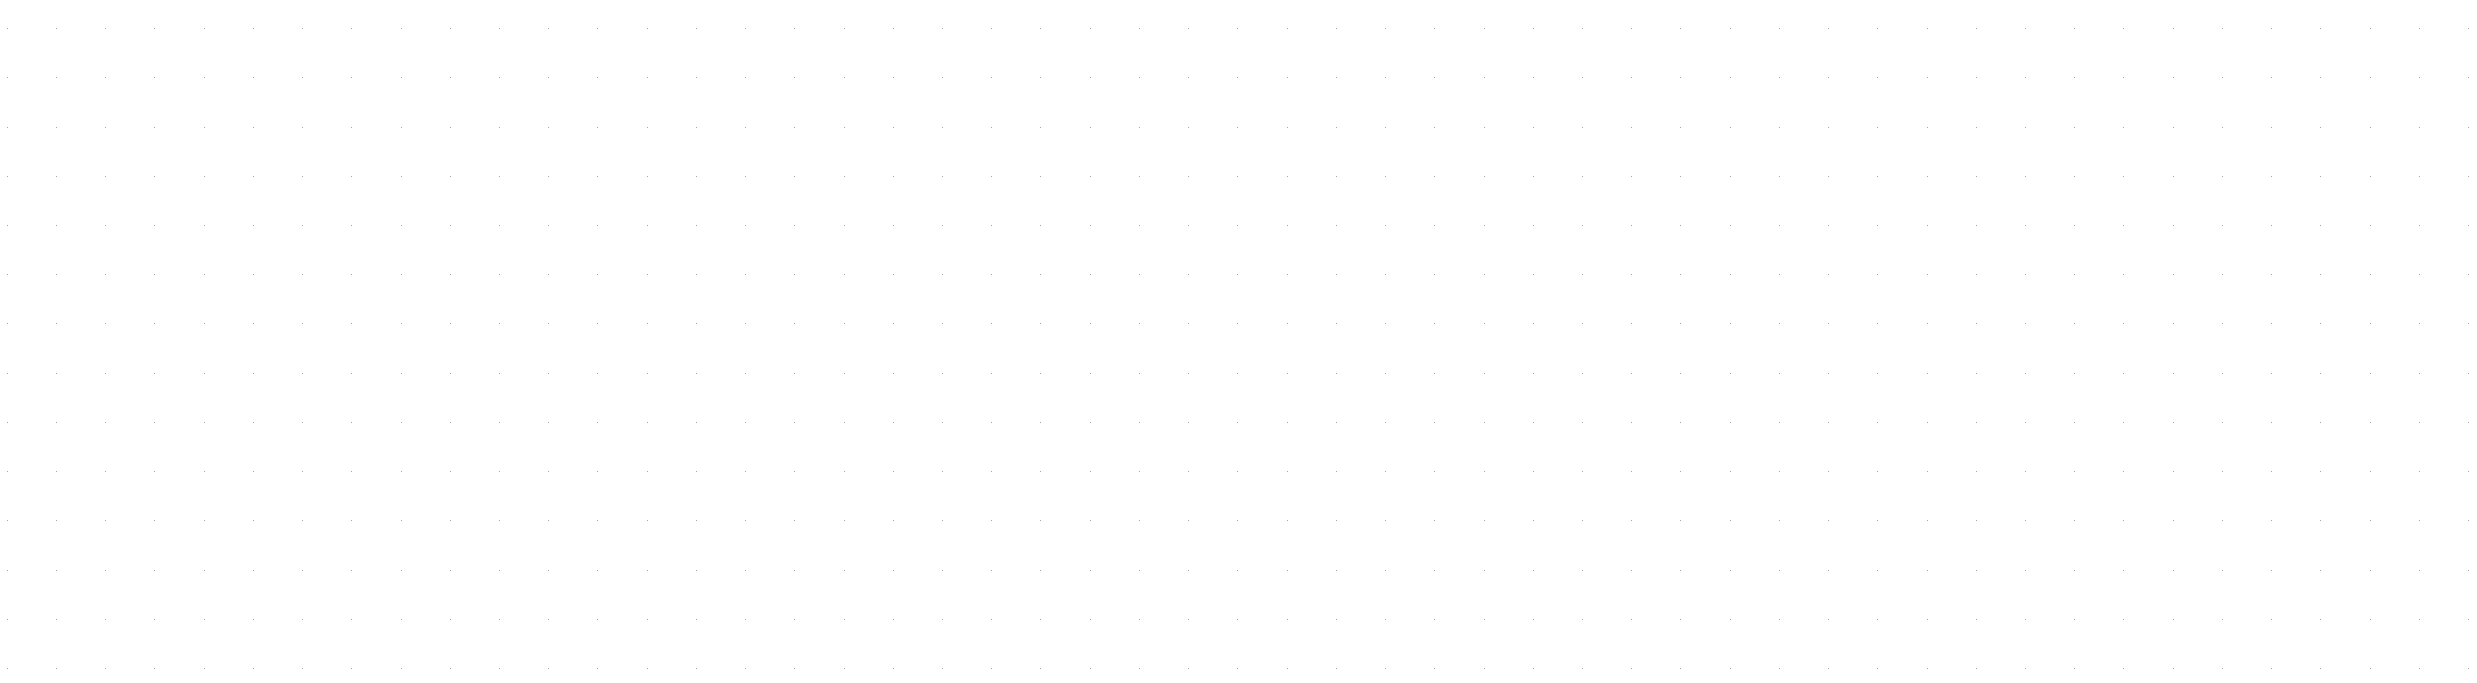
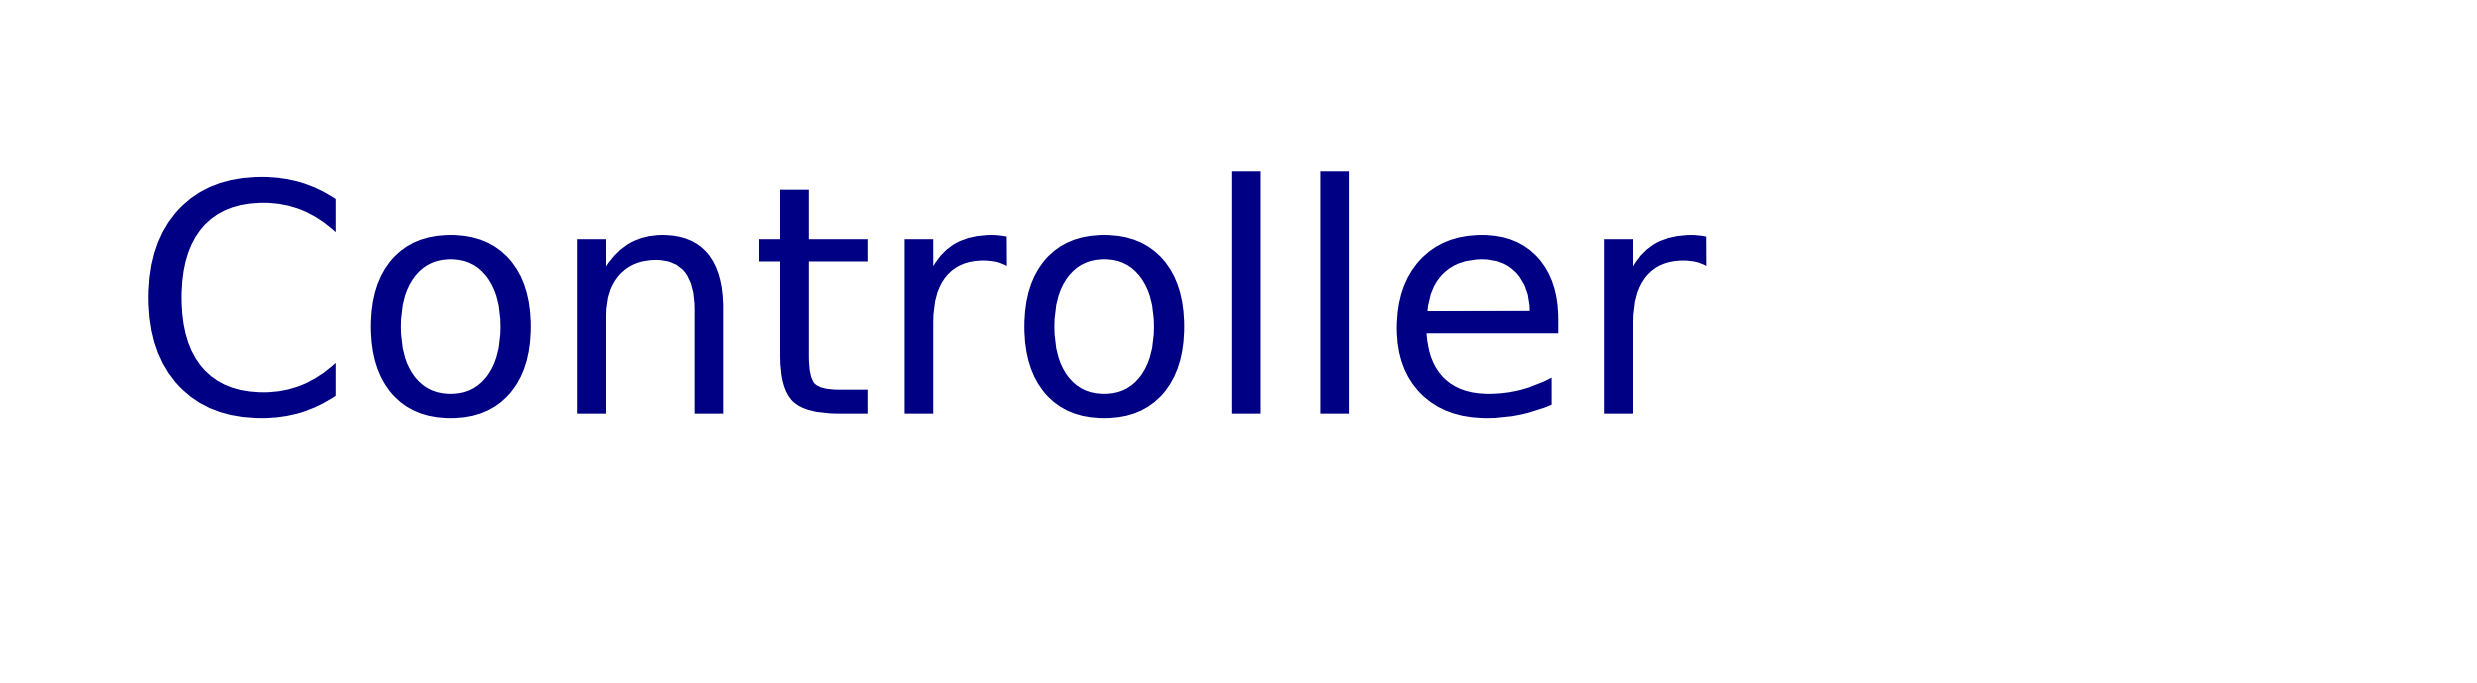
text: none -> Controller (927, 294)

